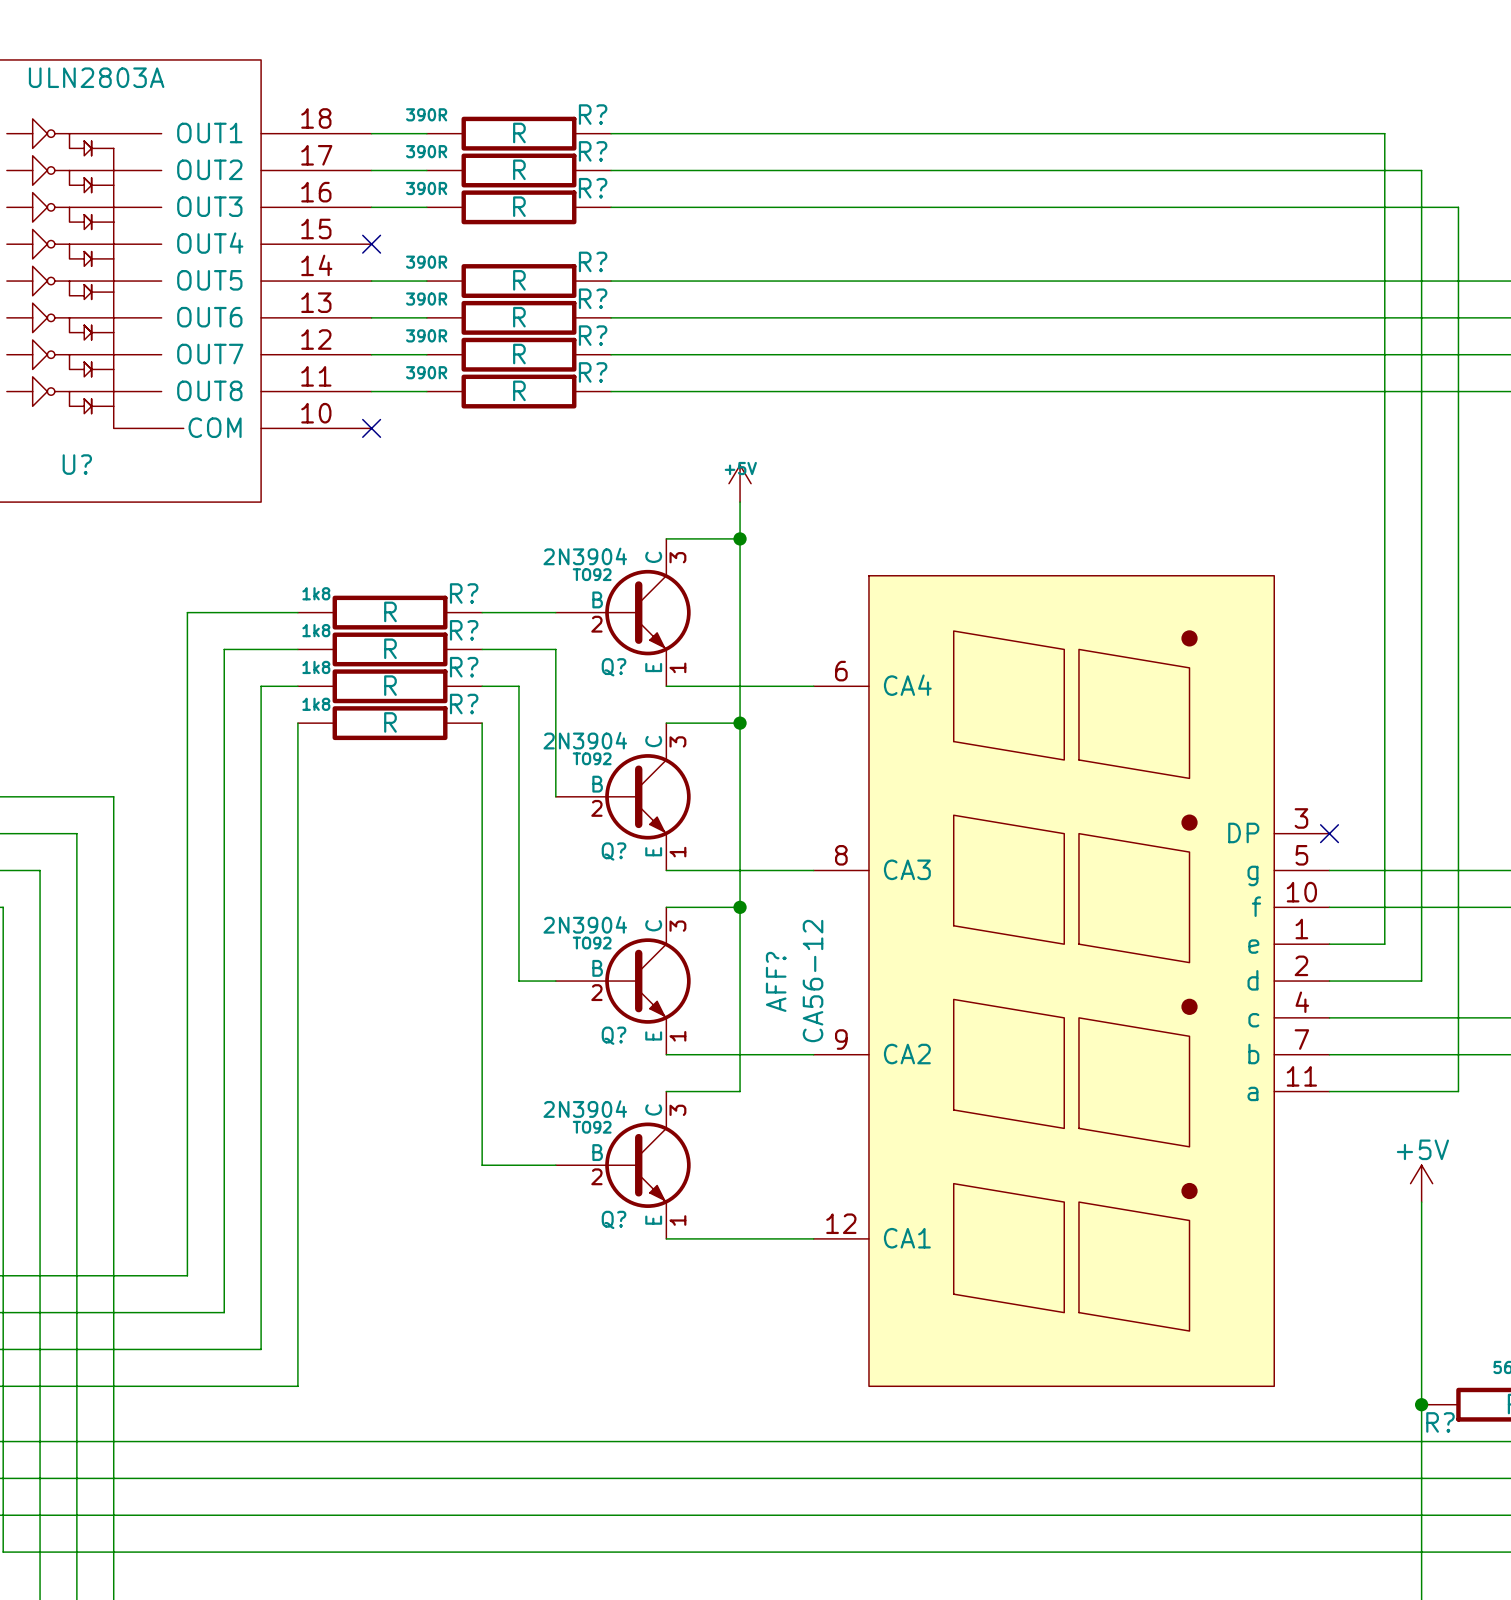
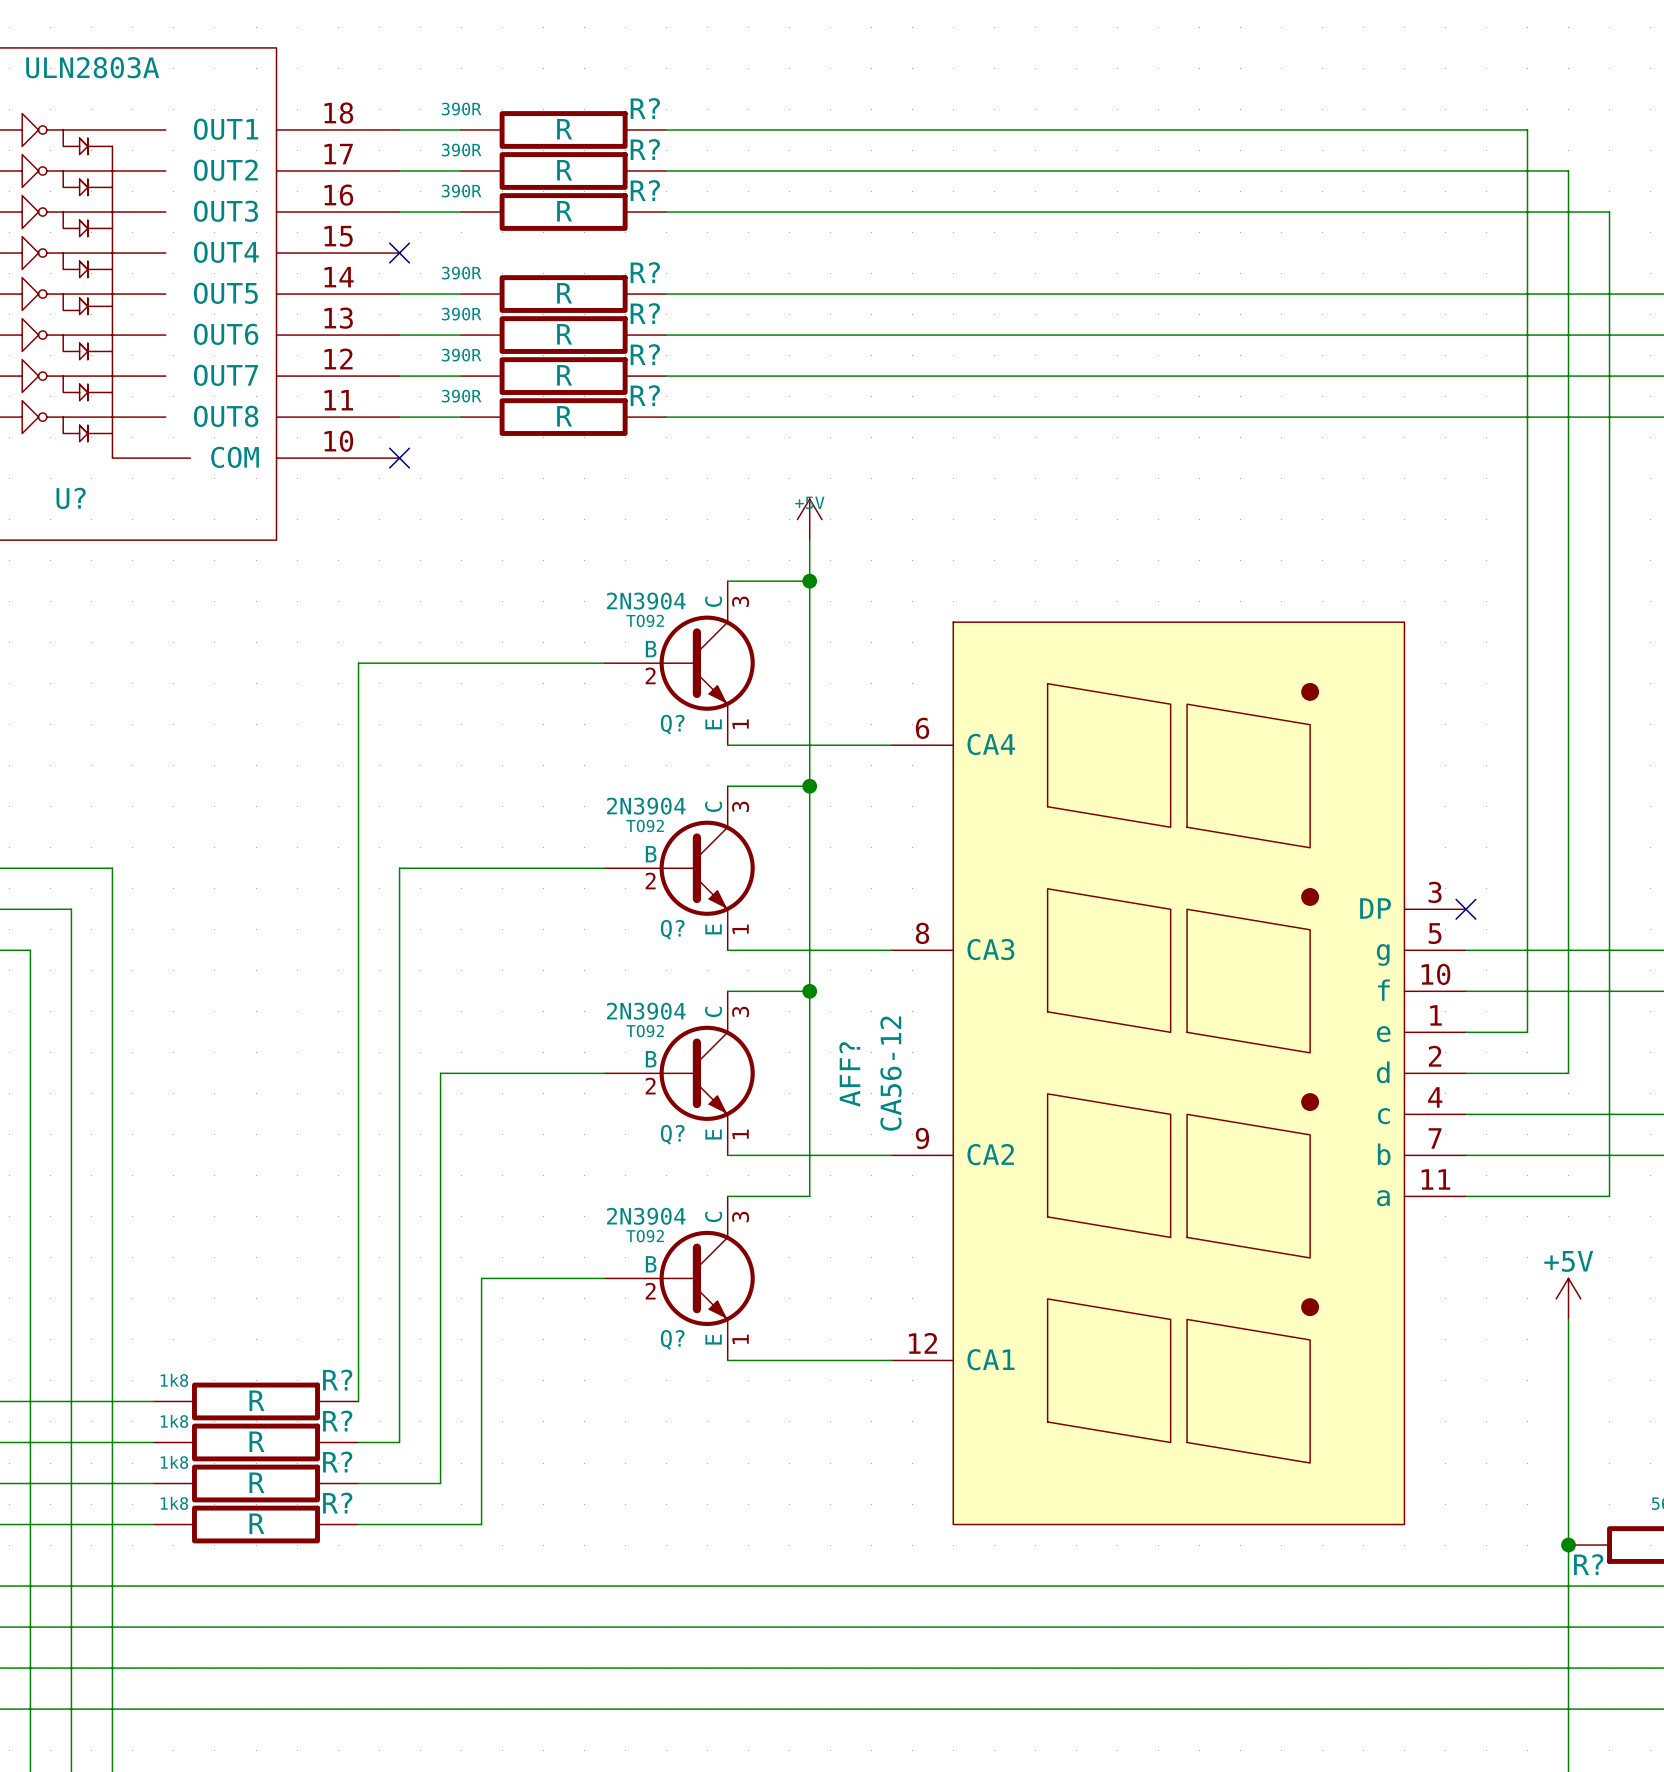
wire: (297, 612) (187, 612) (187, 1275) (150, 1275) -> none
R?: R (390, 612) -> none
wire: none -> (522, 663) (358, 663) (358, 1401)
wire: (297, 649) (224, 649) (224, 1312) (150, 1312) -> none
R?: R (390, 649) -> none
wire: (482, 649) (555, 649) (555, 796) -> (358, 1442) (399, 1442) (399, 868) (604, 868)
wire: (297, 686) (261, 686) (261, 1349) (150, 1349) -> none
R?: R (390, 686) -> none
wire: (482, 686) (518, 686) (518, 981) -> (358, 1483) (440, 1483) (440, 1073) (563, 1073)
wire: (297, 723) (297, 1386) (150, 1386) -> none
R?: R (390, 723) -> none
wire: (482, 723) (482, 1165) -> (358, 1524) (481, 1524) (481, 1278) (522, 1278)
R?: none -> R (256, 1401)
R?: none -> R (256, 1442)
R?: none -> R (256, 1483)
R?: none -> R (256, 1524)

